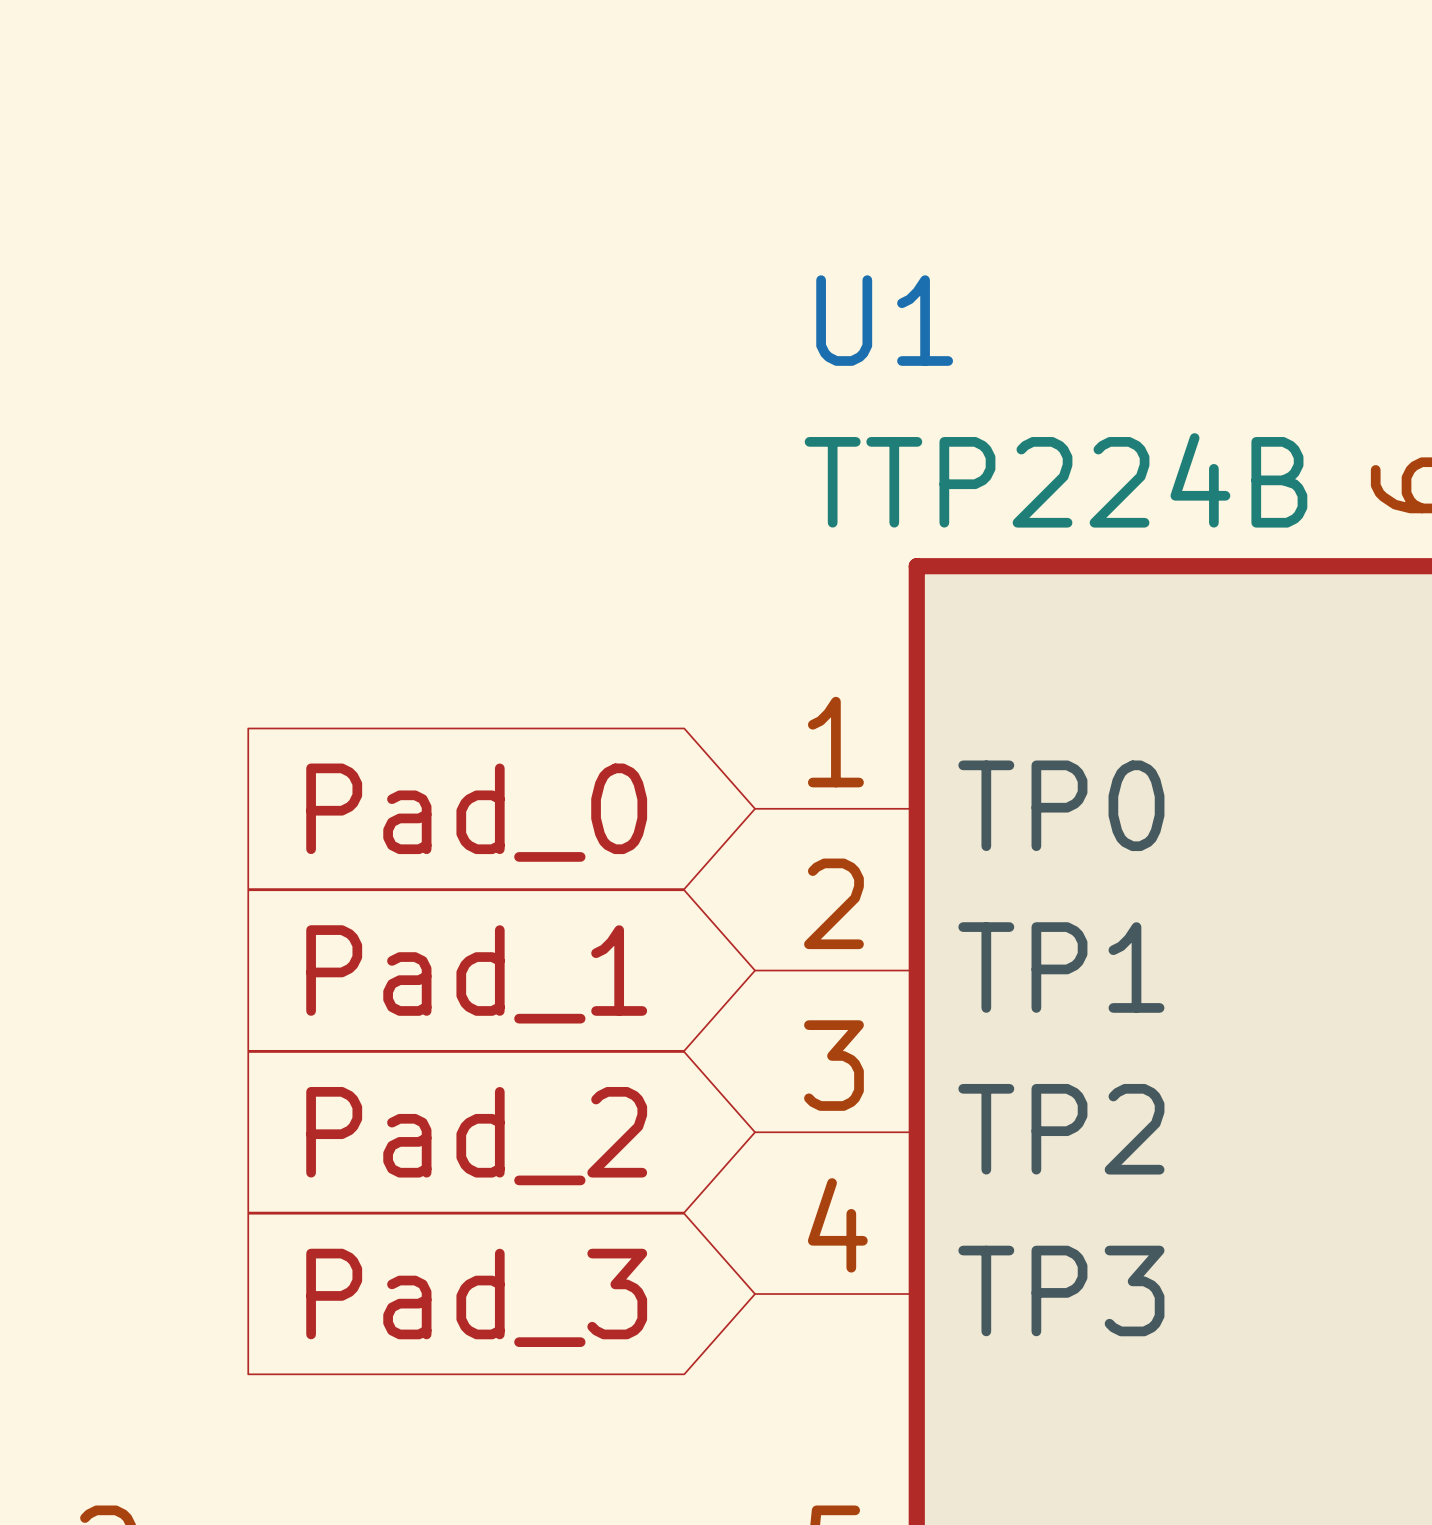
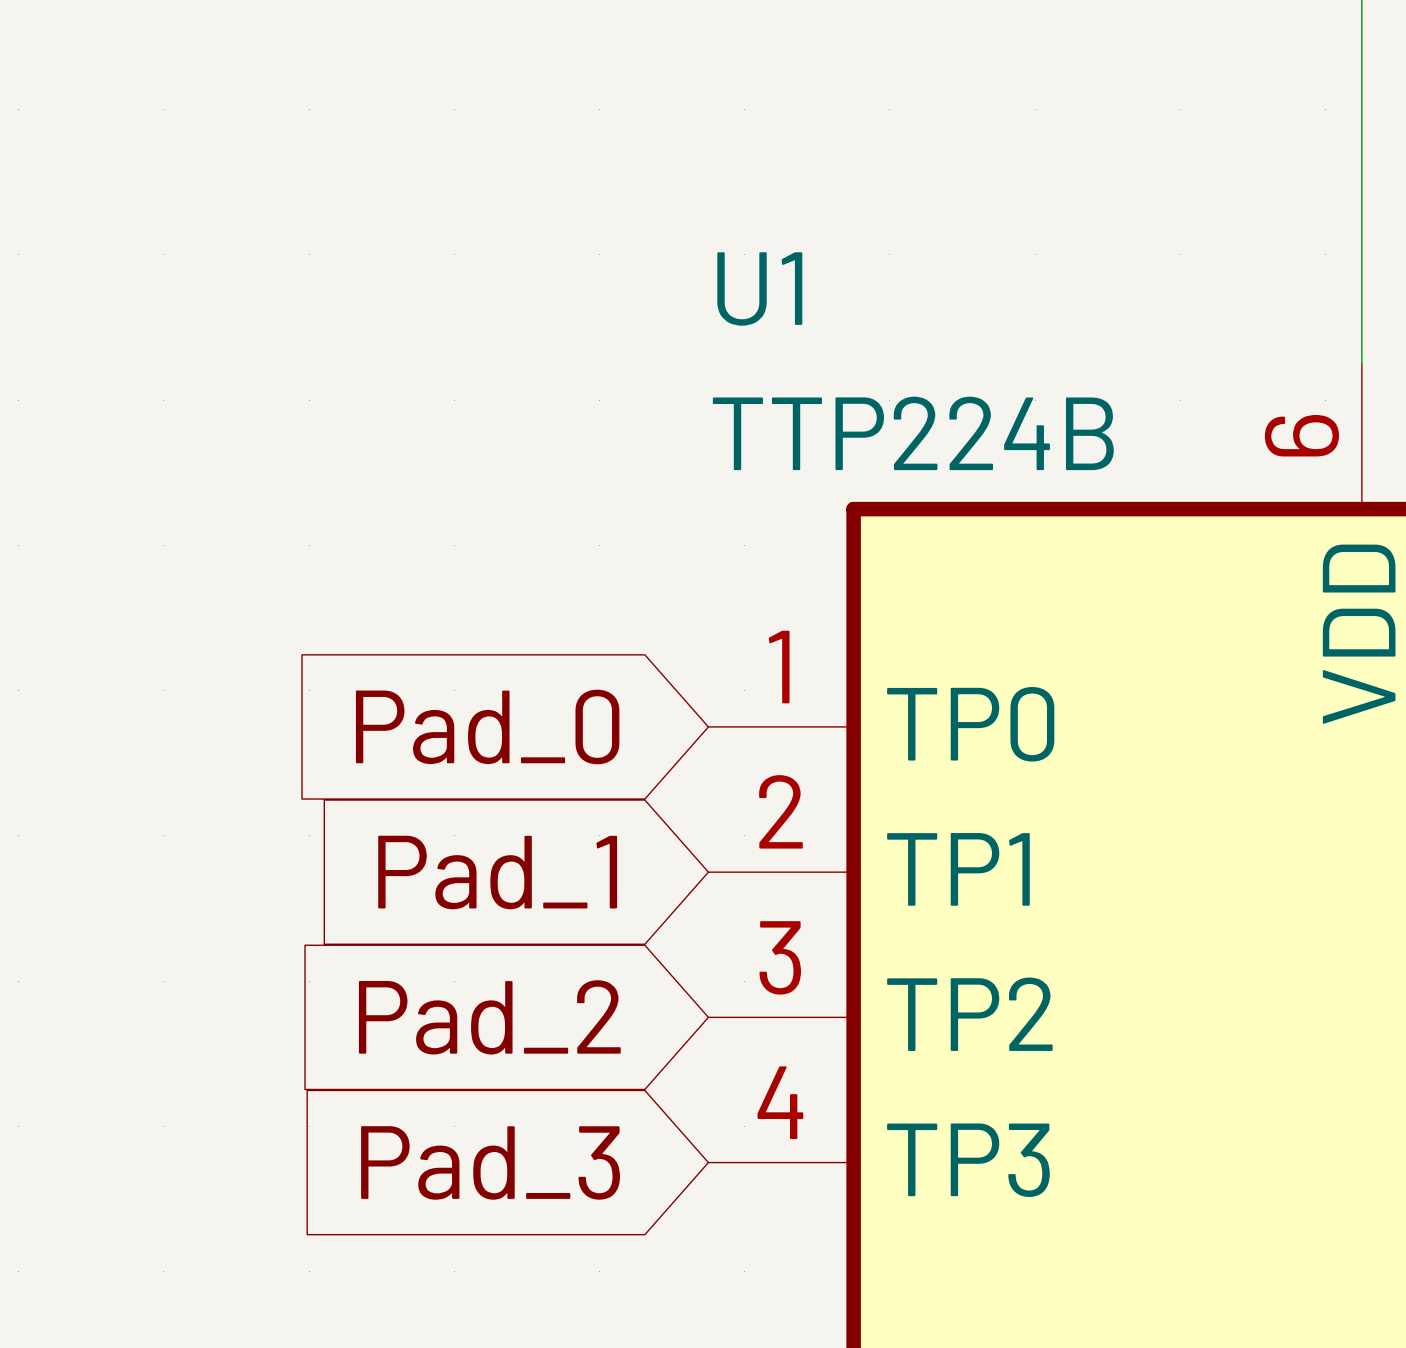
U1 name position: U1 (884, 320) -> U1 (759, 288)
U1 value position: TTP224B (1056, 480) -> TTP224B (913, 433)

